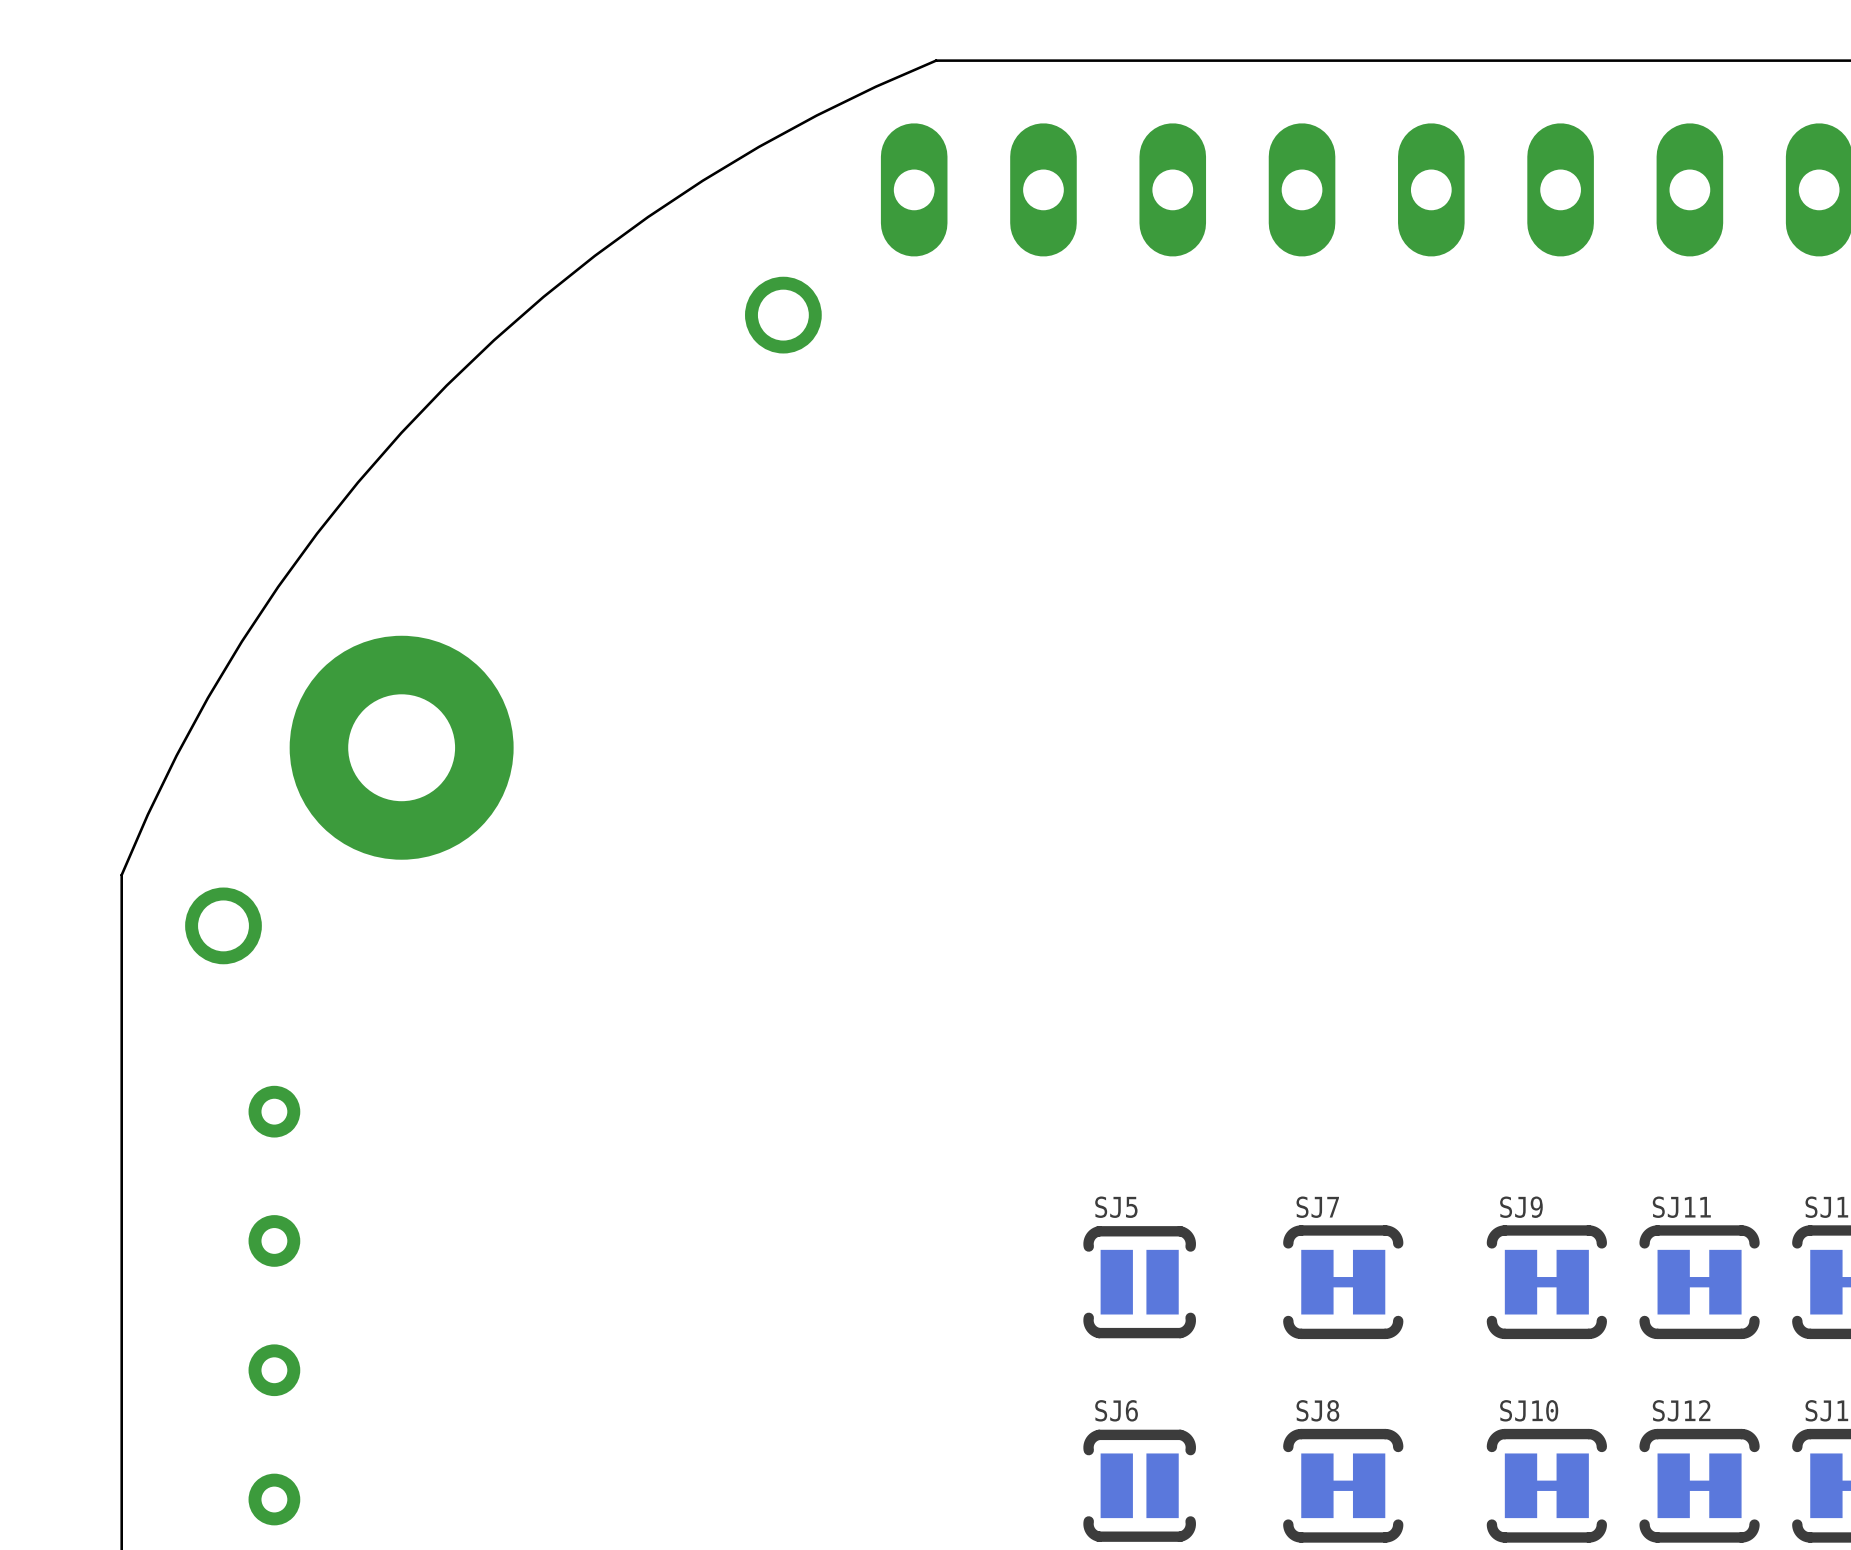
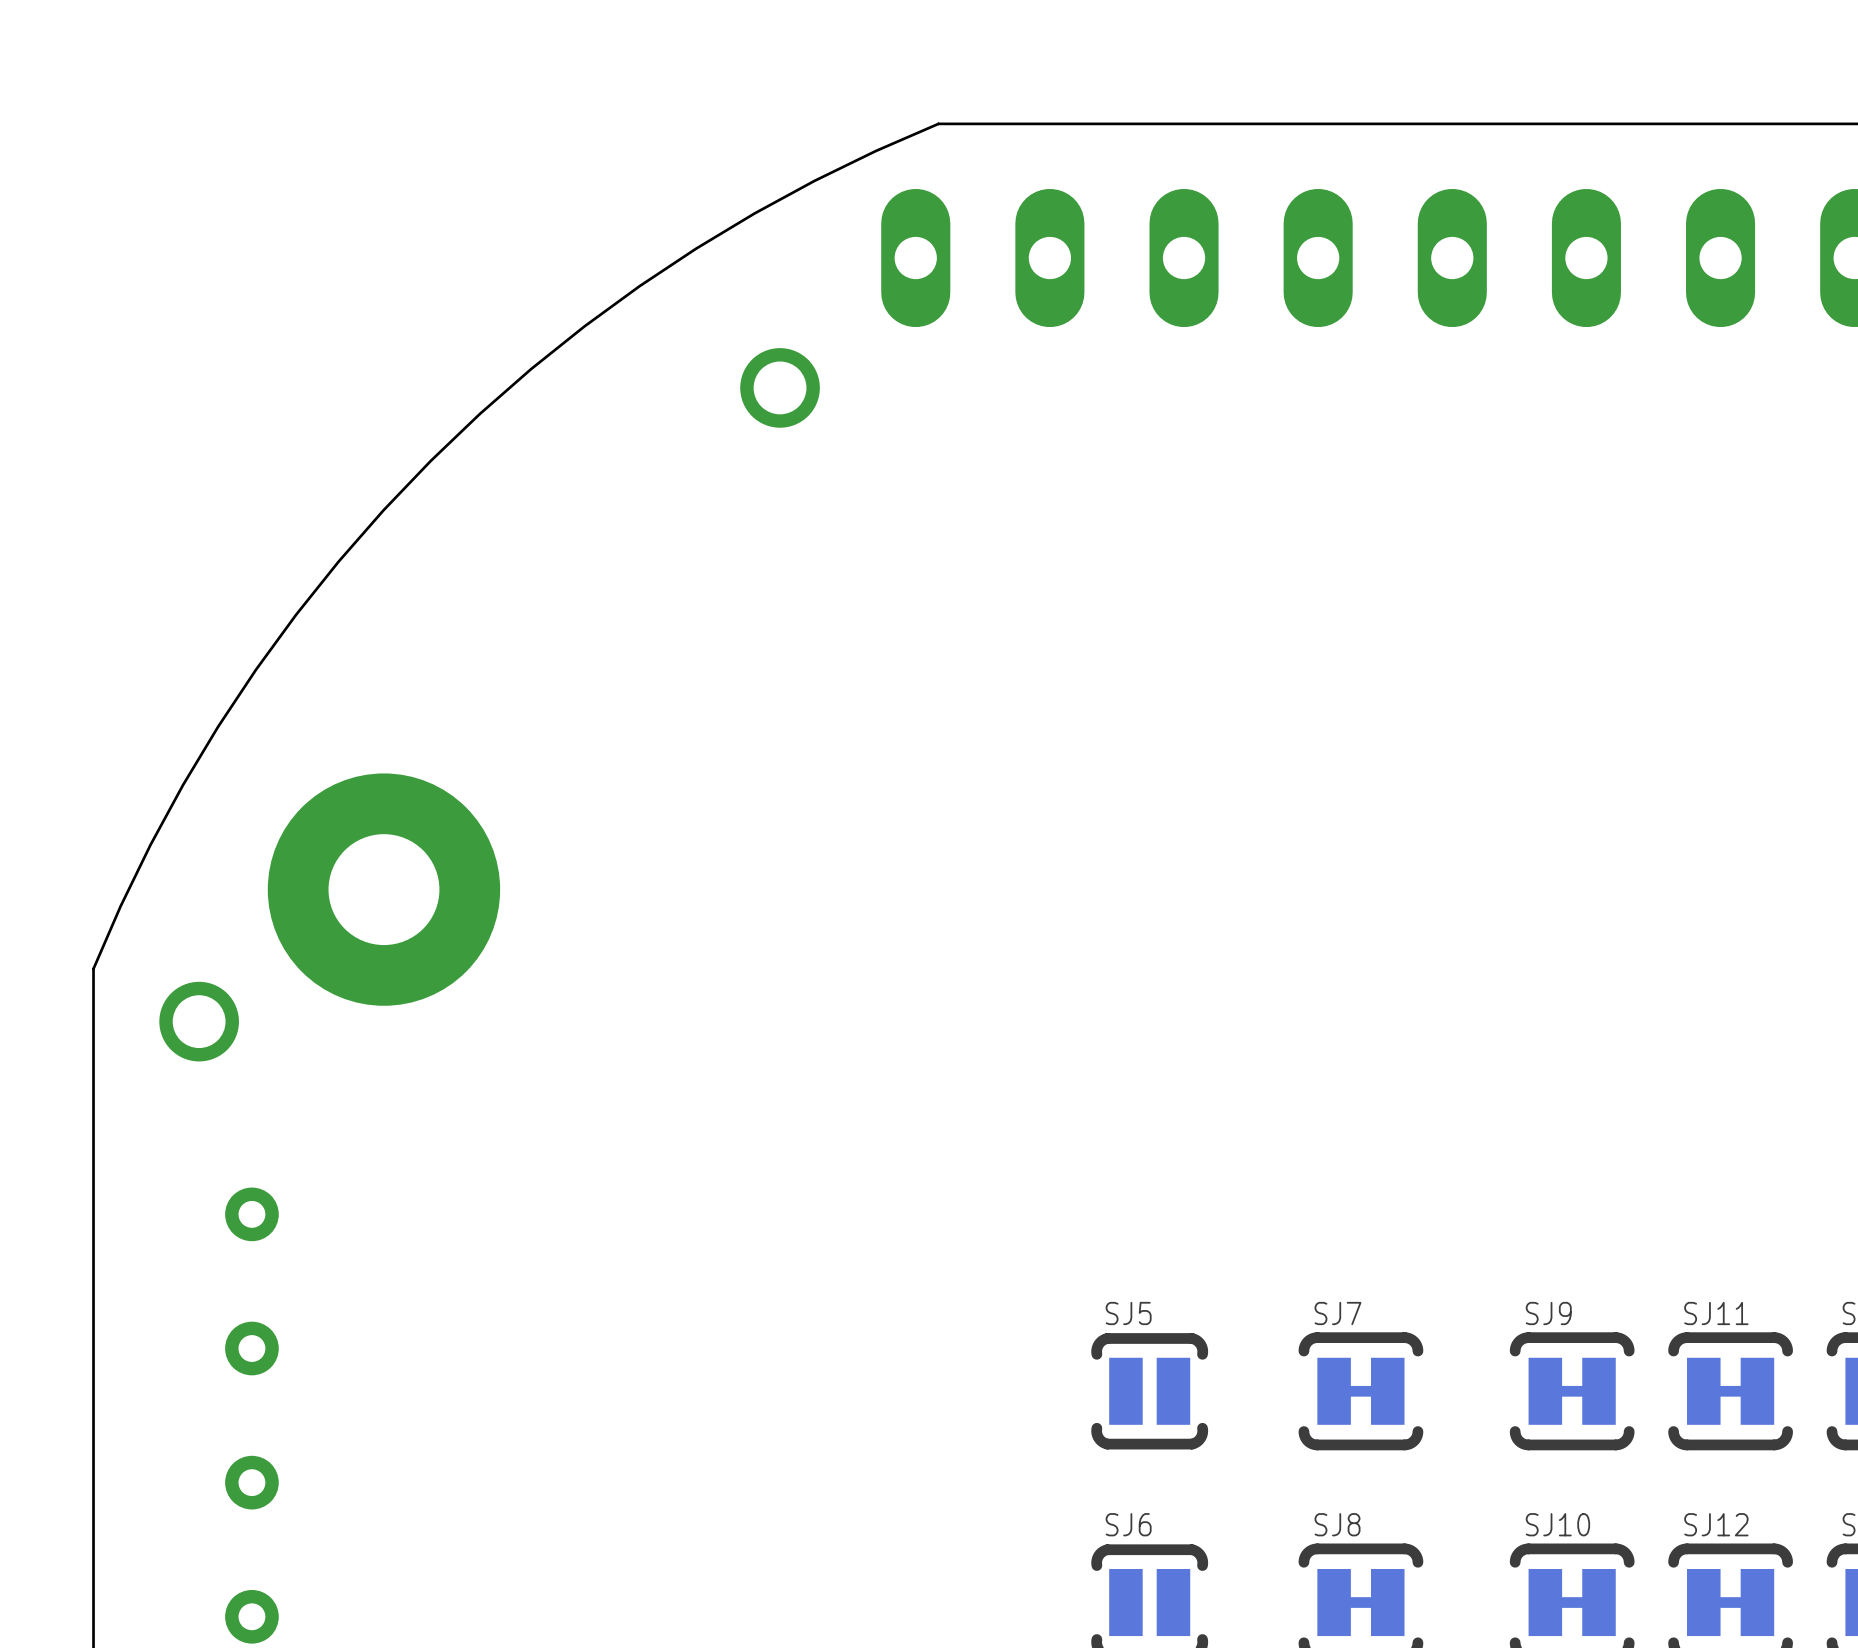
part position: (401, 747) -> (383, 889)

